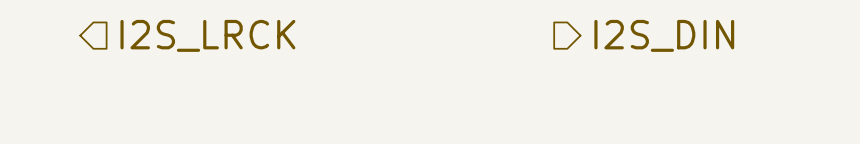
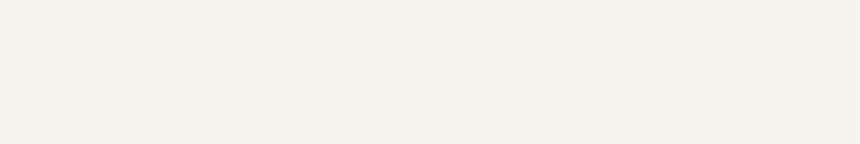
hierarchical label: I2S_LRCK (207, 35) -> none
hierarchical label: I2S_DIN (664, 35) -> none

